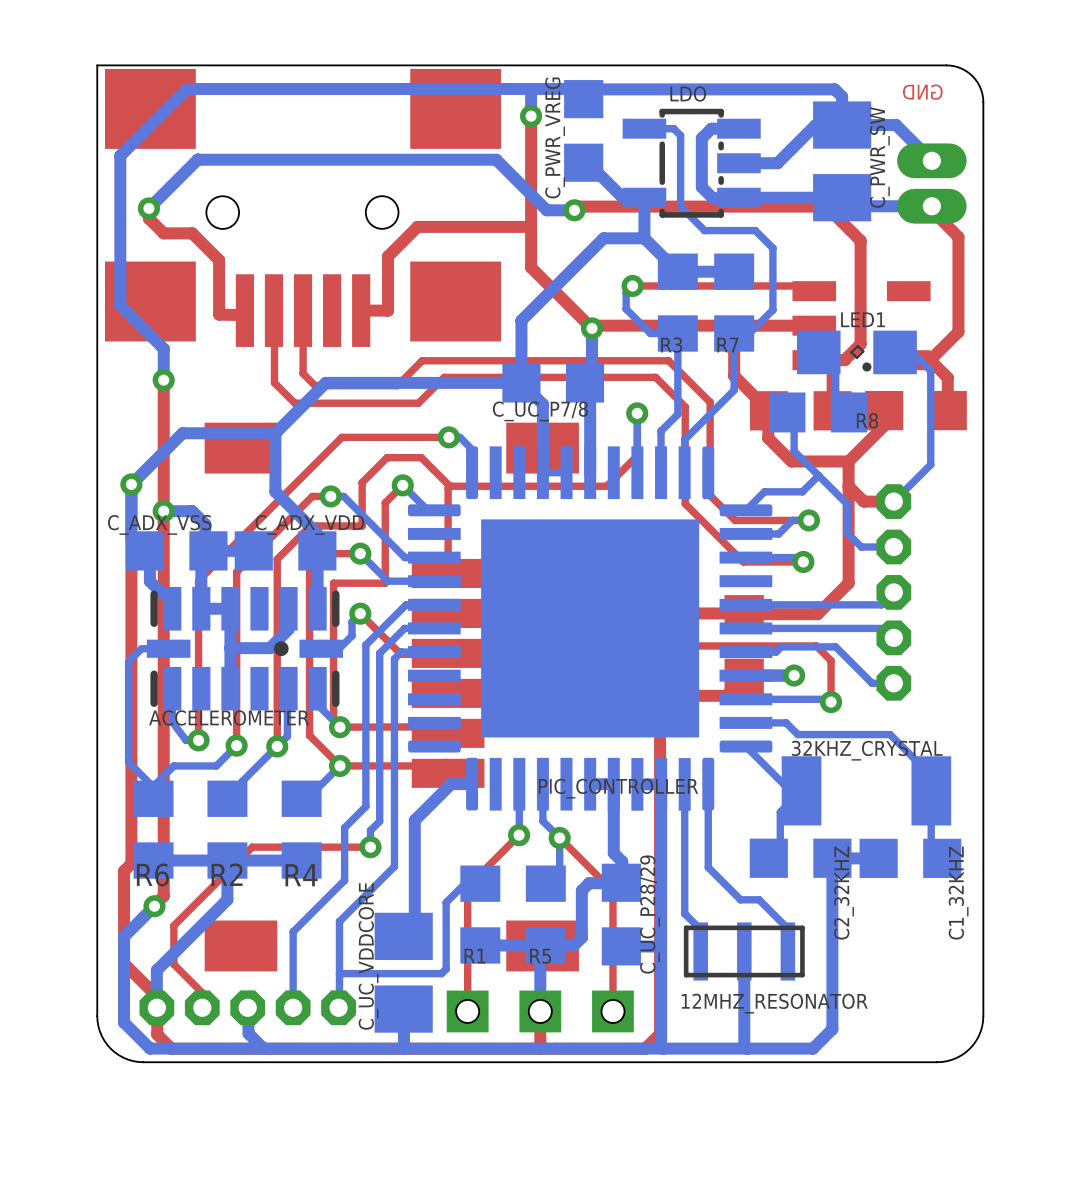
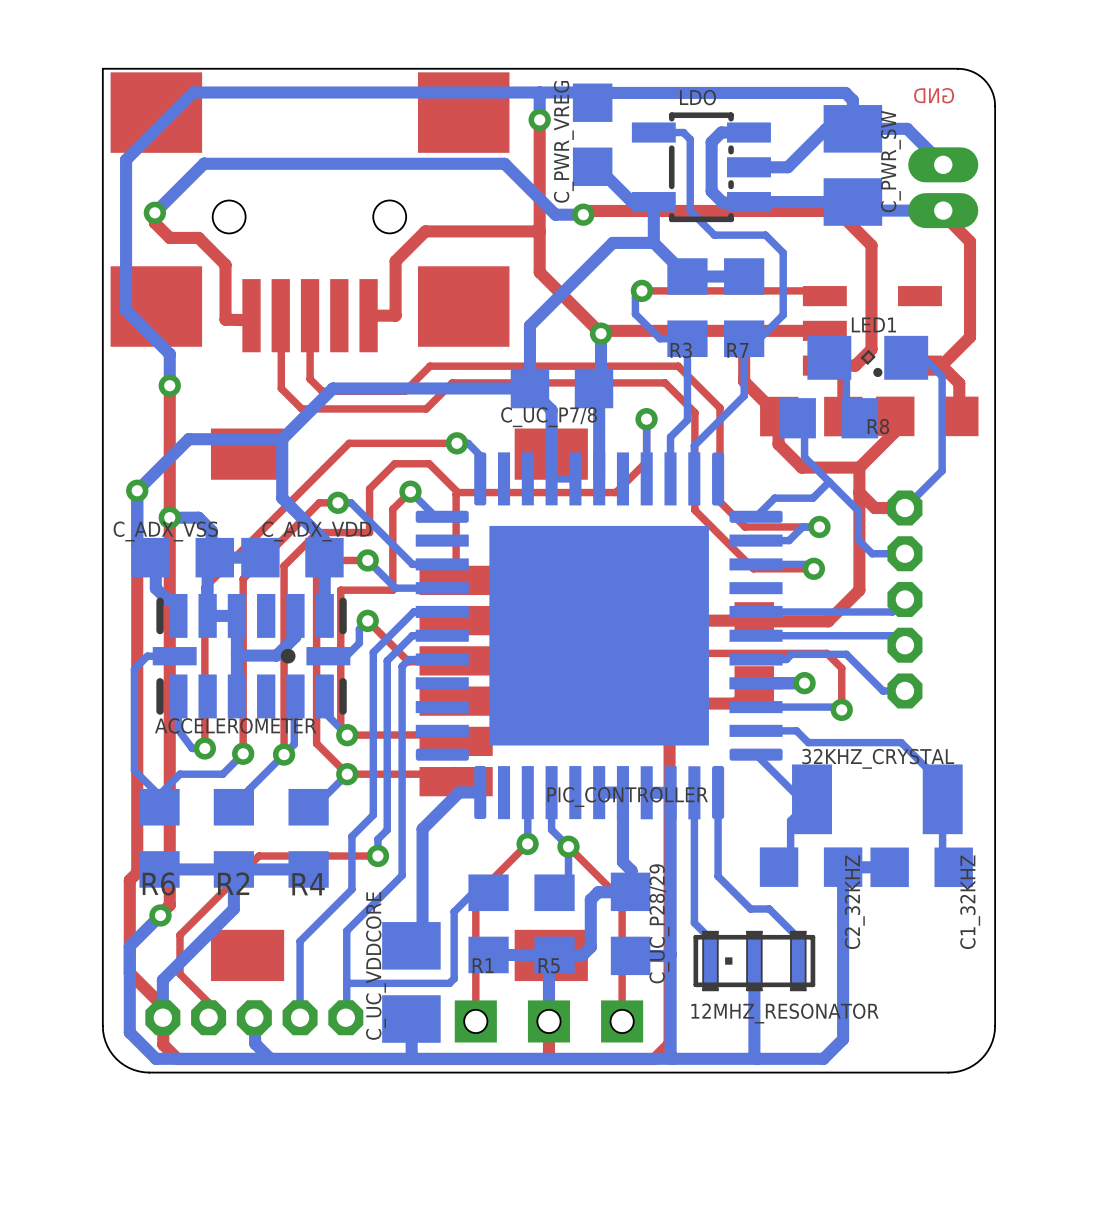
part footprint: [683, 922, 805, 981] -> [693, 930, 816, 992]

